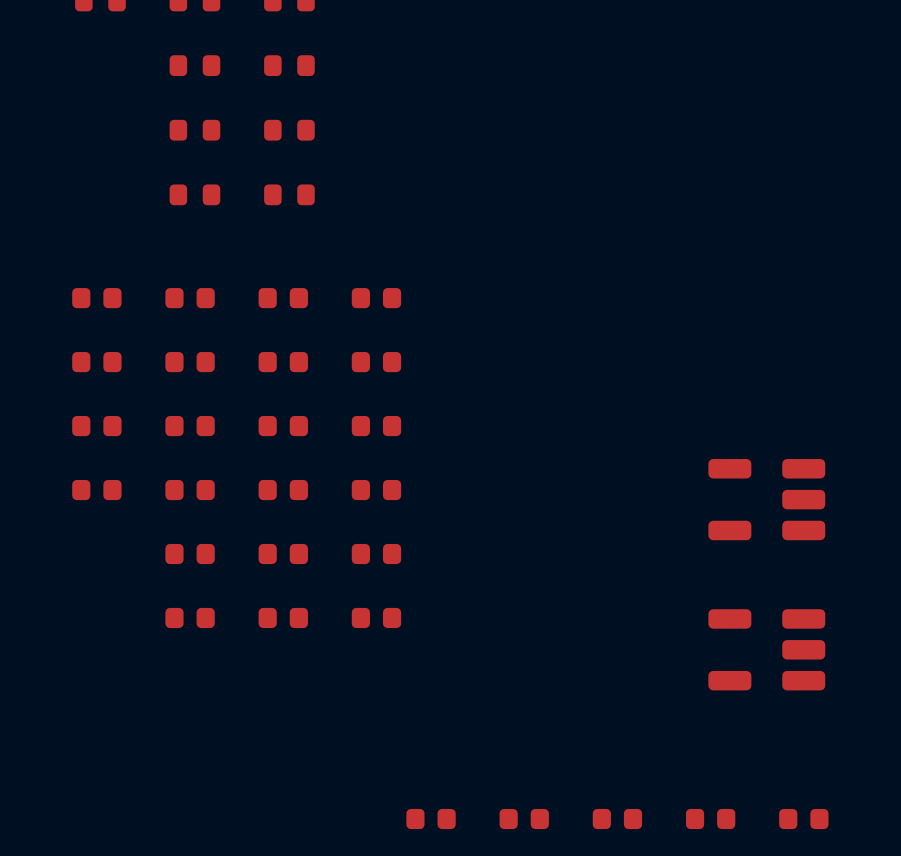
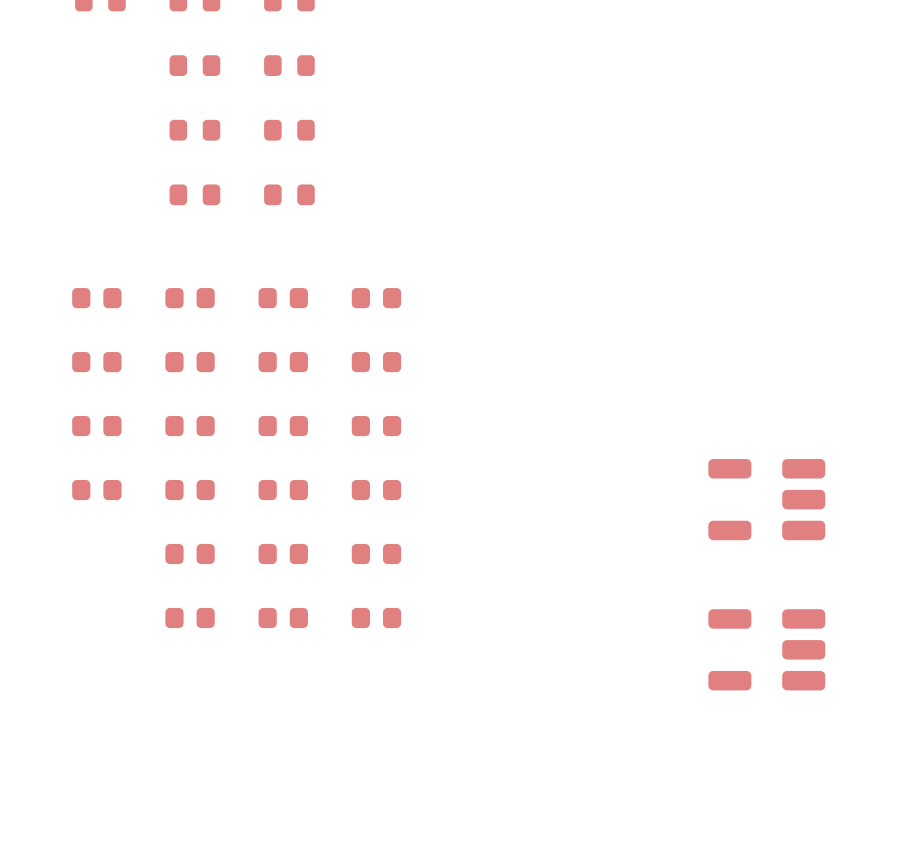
part: (431, 819) -> none
part: (524, 819) -> none
part: (617, 819) -> none
part: (710, 819) -> none
part: (803, 819) -> none

